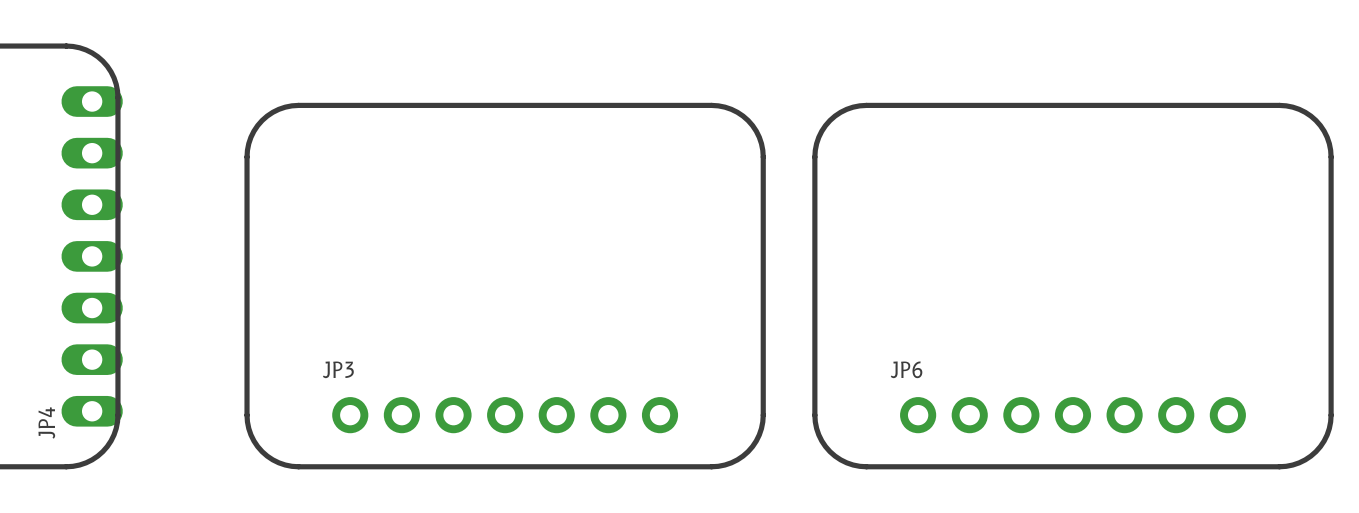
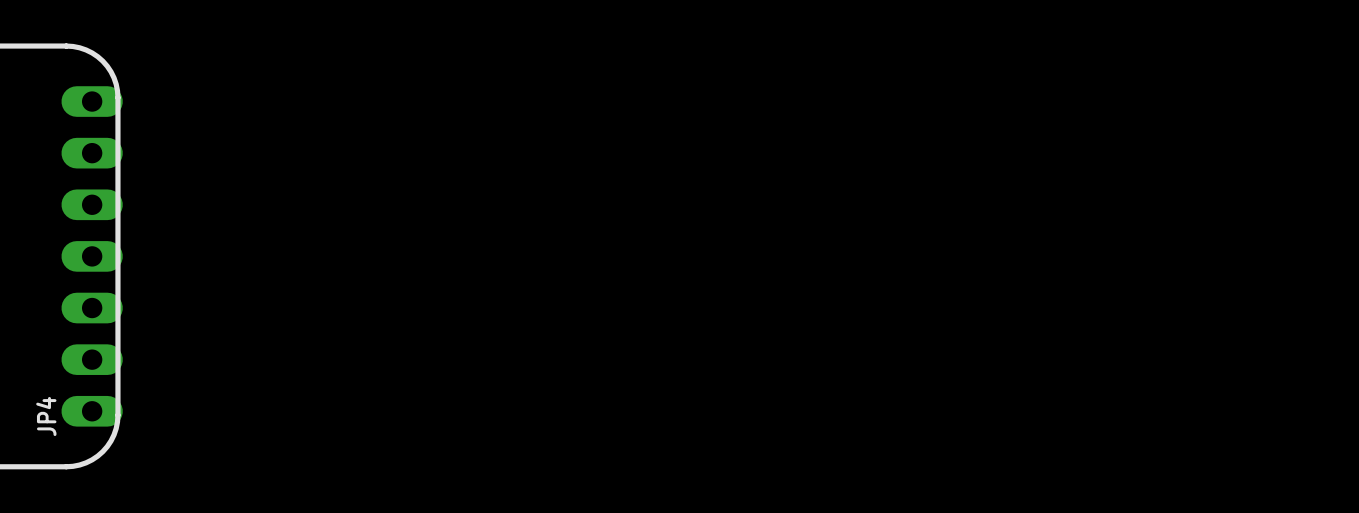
line: (298, 105) (711, 105) (724, 107) (743, 116) (752, 125) (759, 137) (763, 157) (763, 415) (761, 428) (752, 446) (743, 456) (731, 462) (711, 466) (298, 466) (285, 465) (267, 456) (257, 446) (250, 434) (247, 415) (247, 150) (250, 137) (262, 120) (278, 109) (298, 105) -> none
line: (866, 105) (1279, 105) (1292, 107) (1310, 116) (1320, 125) (1327, 137) (1331, 157) (1331, 415) (1329, 428) (1320, 446) (1310, 456) (1299, 462) (1279, 466) (866, 466) (853, 465) (835, 456) (825, 446) (818, 434) (814, 415) (815, 150) (818, 137) (829, 120) (846, 109) (866, 105) -> none
JP3: (505, 415) -> none
JP6: (1072, 415) -> none

